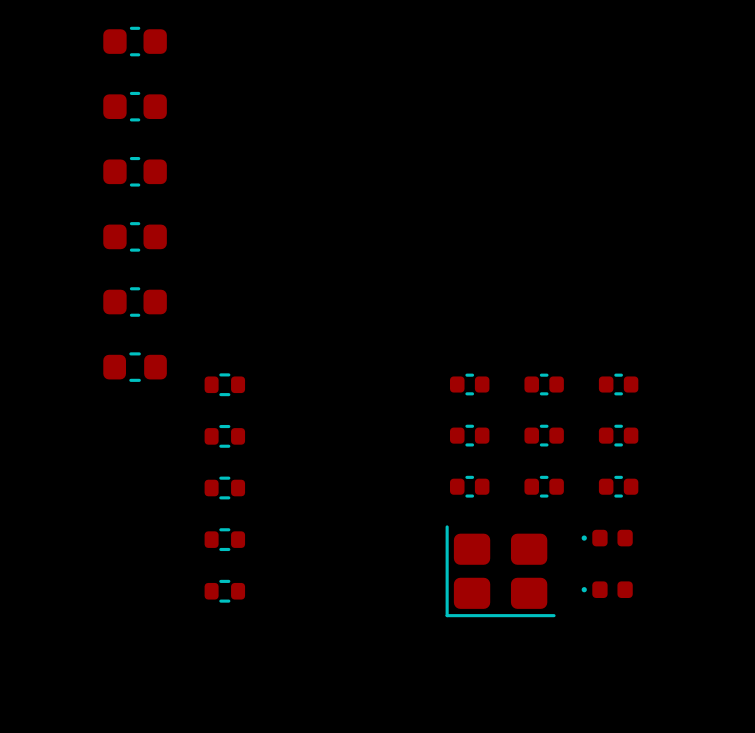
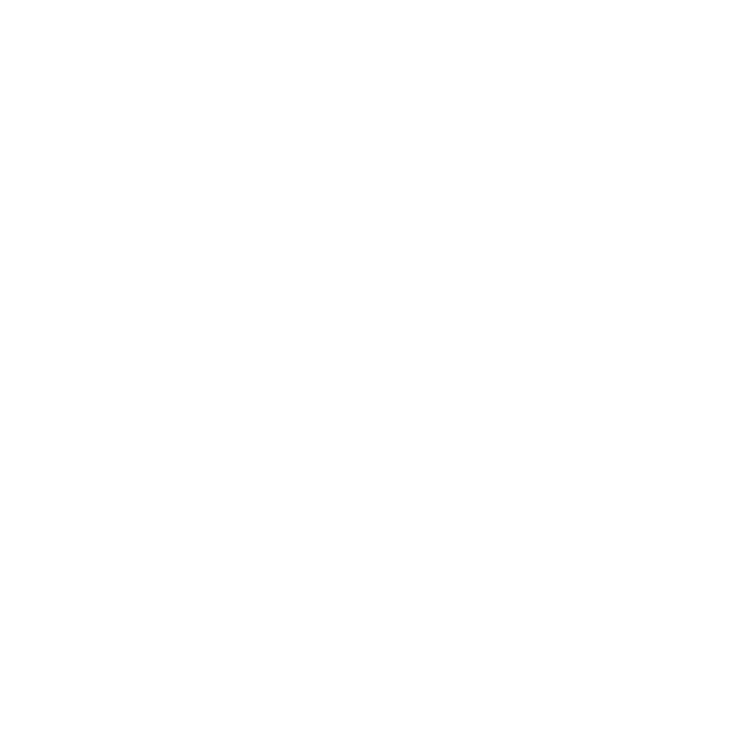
part: (135, 41) -> none
part: (135, 106) -> none
part: (135, 171) -> none
part: (135, 236) -> none
part: (135, 302) -> none
part: (135, 367) -> none
part: (224, 384) -> none
part: (469, 384) -> none
part: (544, 384) -> none
part: (618, 384) -> none
part: (469, 435) -> none
part: (544, 435) -> none
part: (618, 435) -> none
part: (224, 436) -> none
part: (469, 486) -> none
part: (544, 486) -> none
part: (618, 486) -> none
part: (224, 488) -> none
part: (607, 538) -> none
part: (224, 539) -> none
part: (500, 571) -> none
part: (607, 589) -> none
part: (224, 591) -> none

